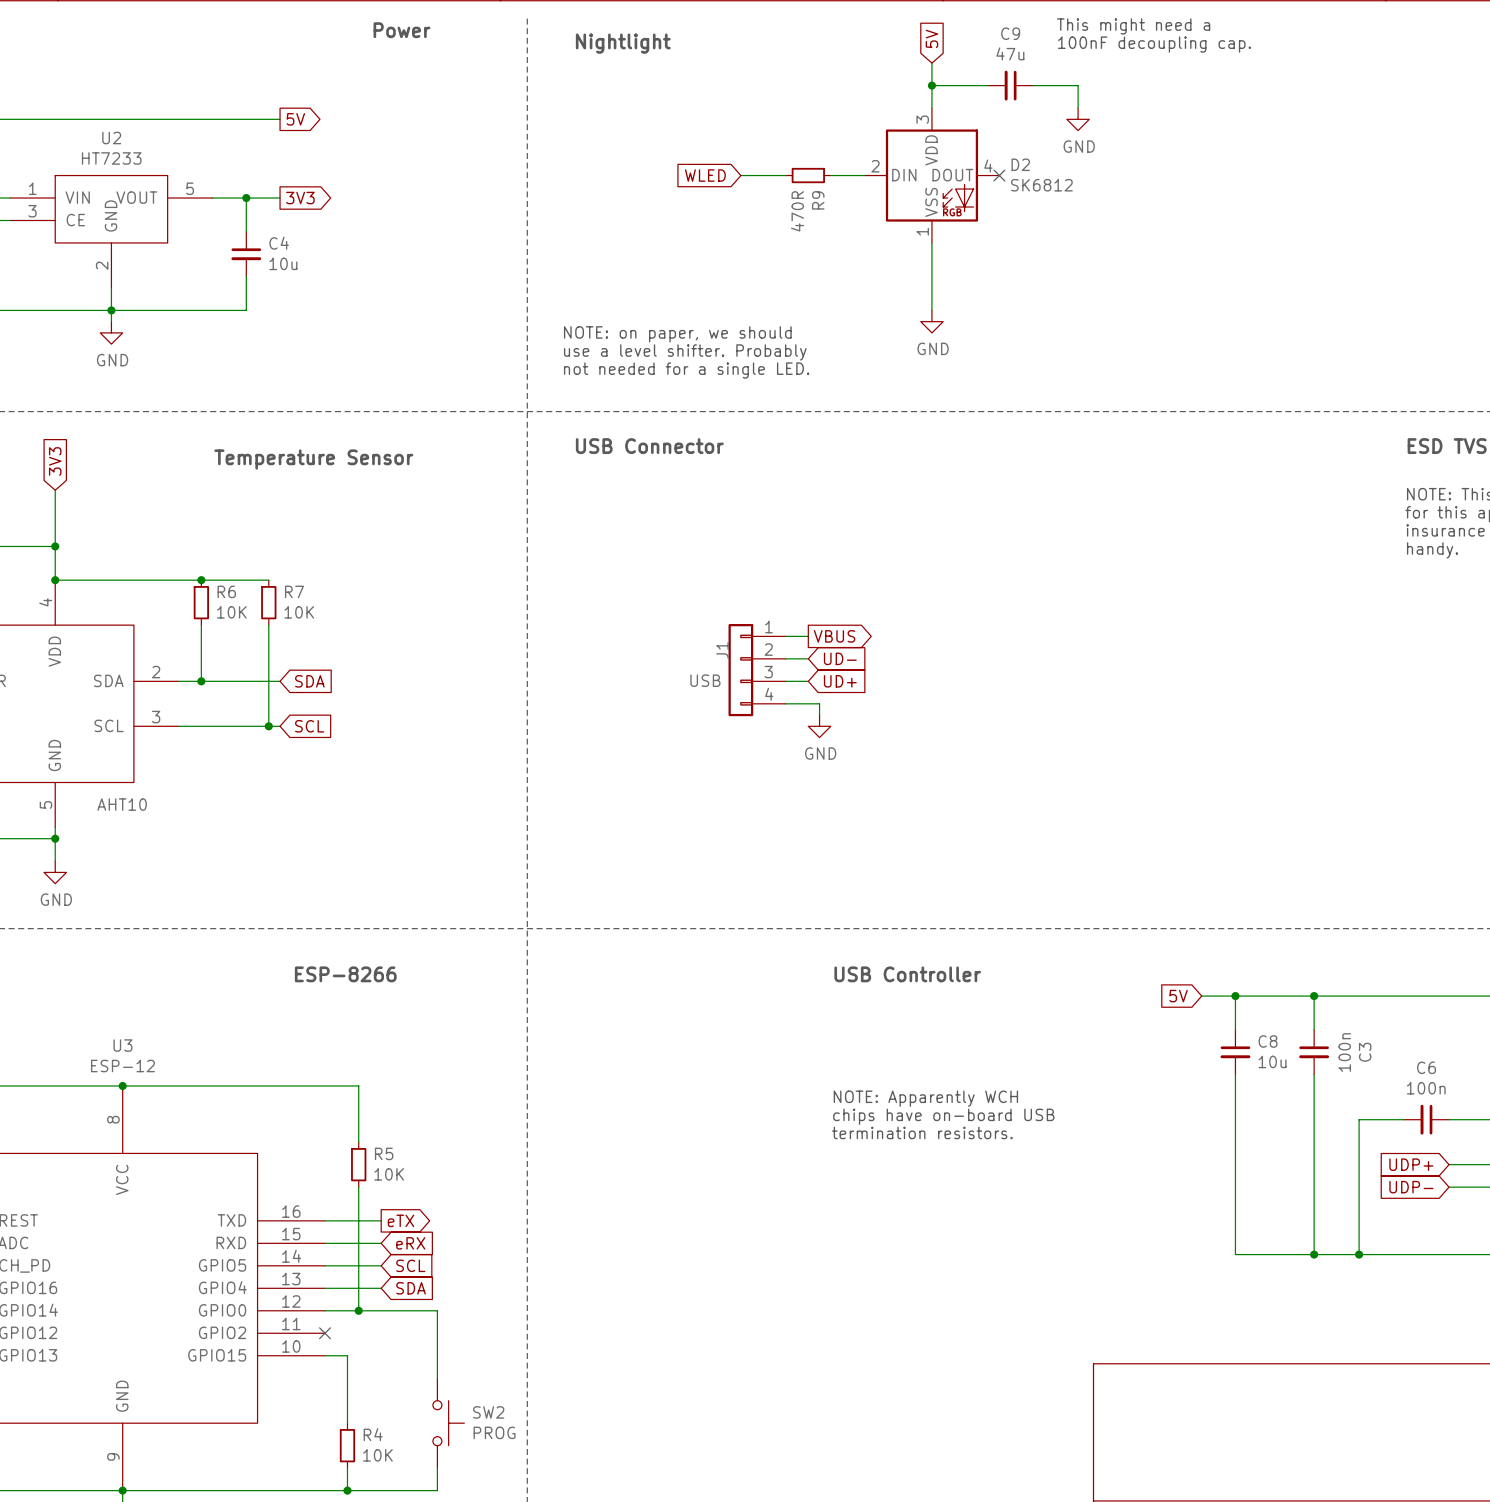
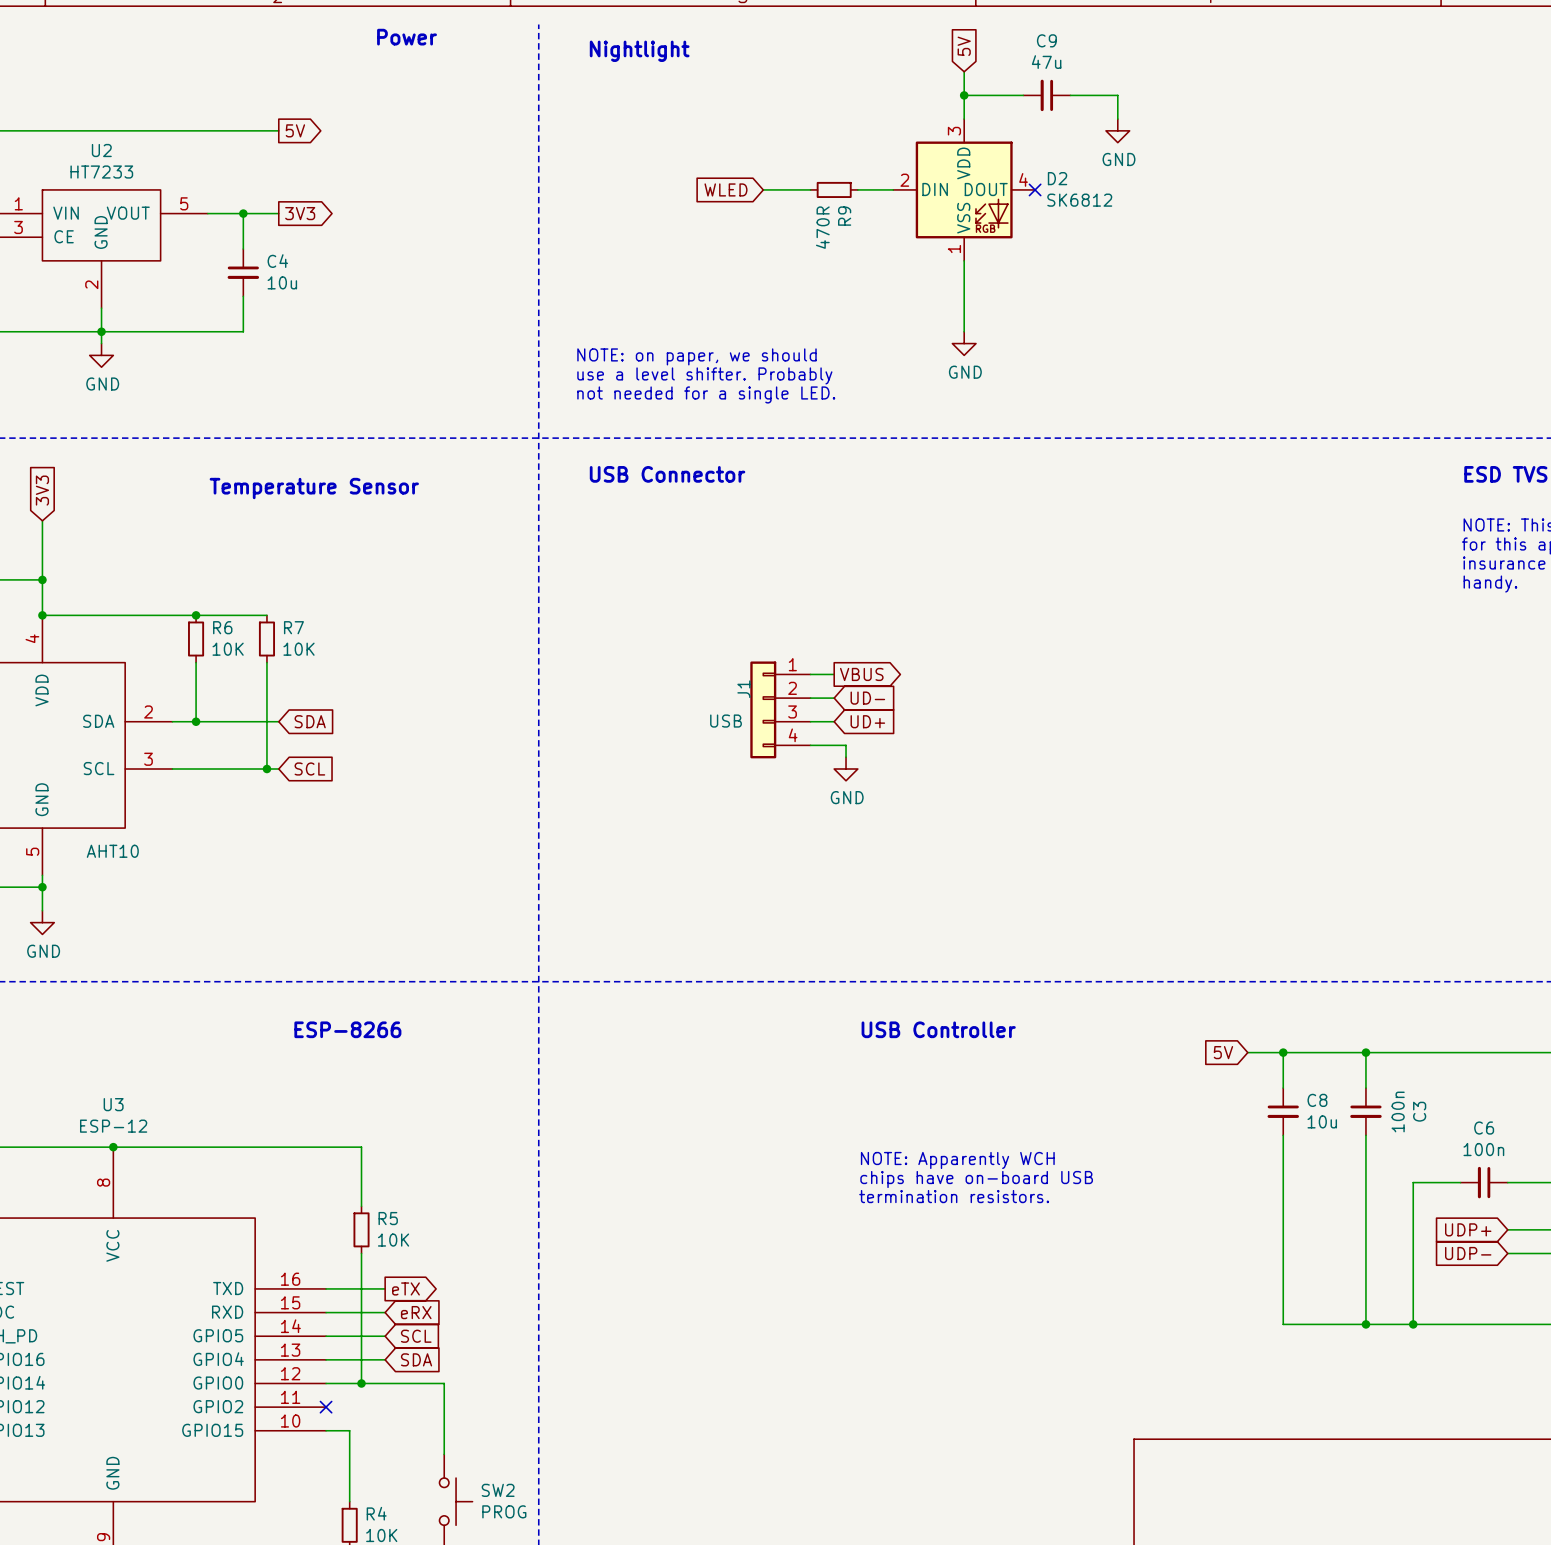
text: This might need a (1133, 26) -> none
text: 100nF decoupling cap. (1154, 44) -> none

